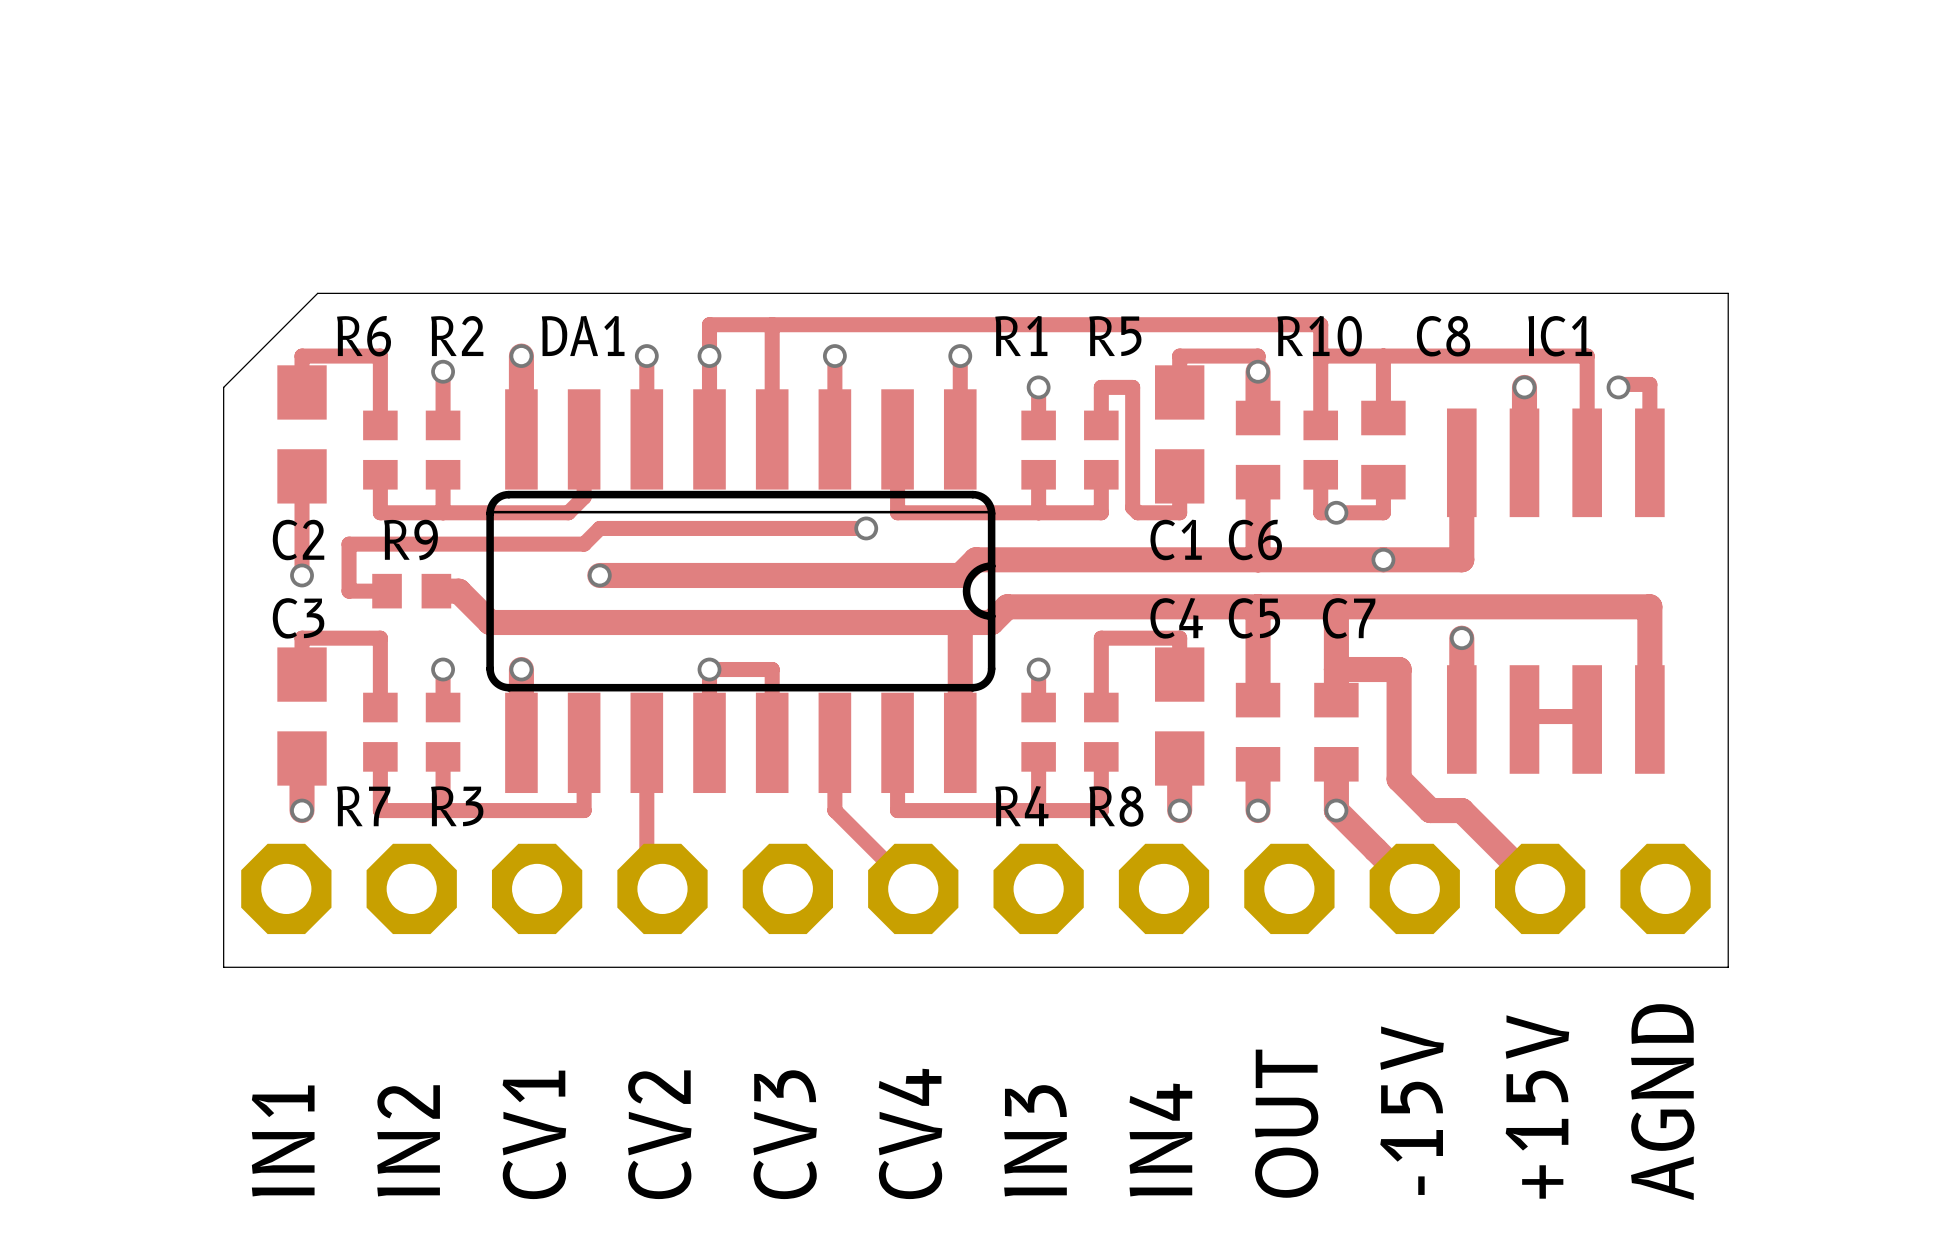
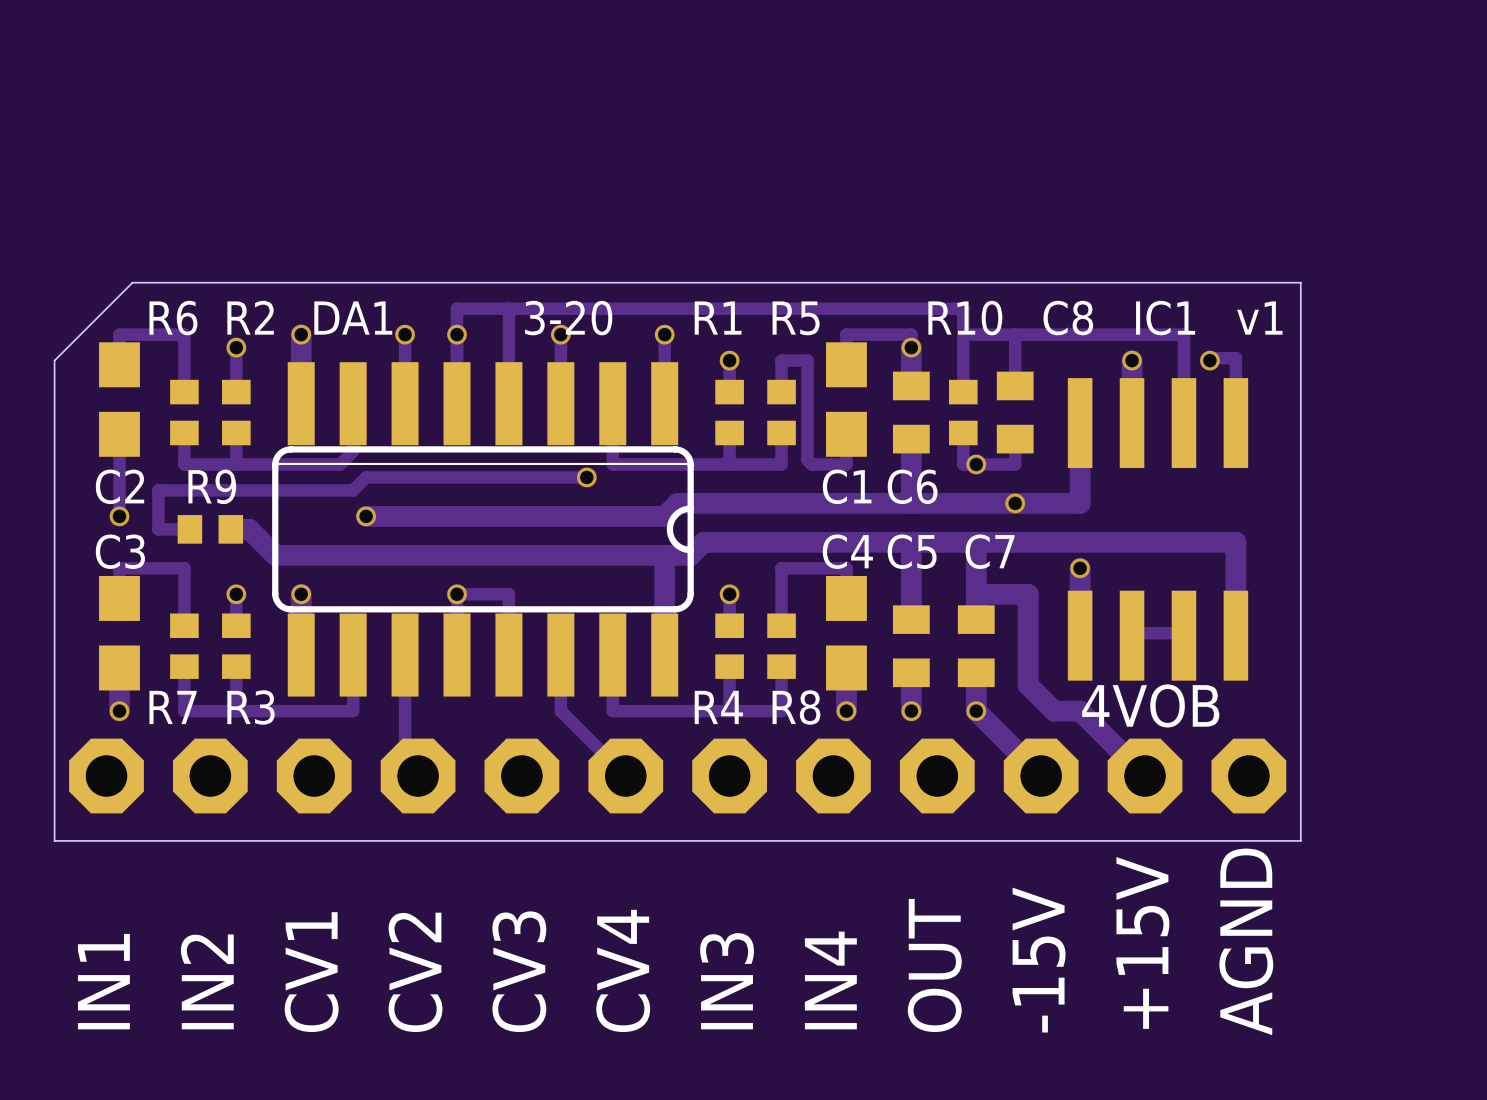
text: none -> 3-20 (568, 318)
text: none -> v1 (1259, 318)
text: none -> 4VOB (1150, 705)

